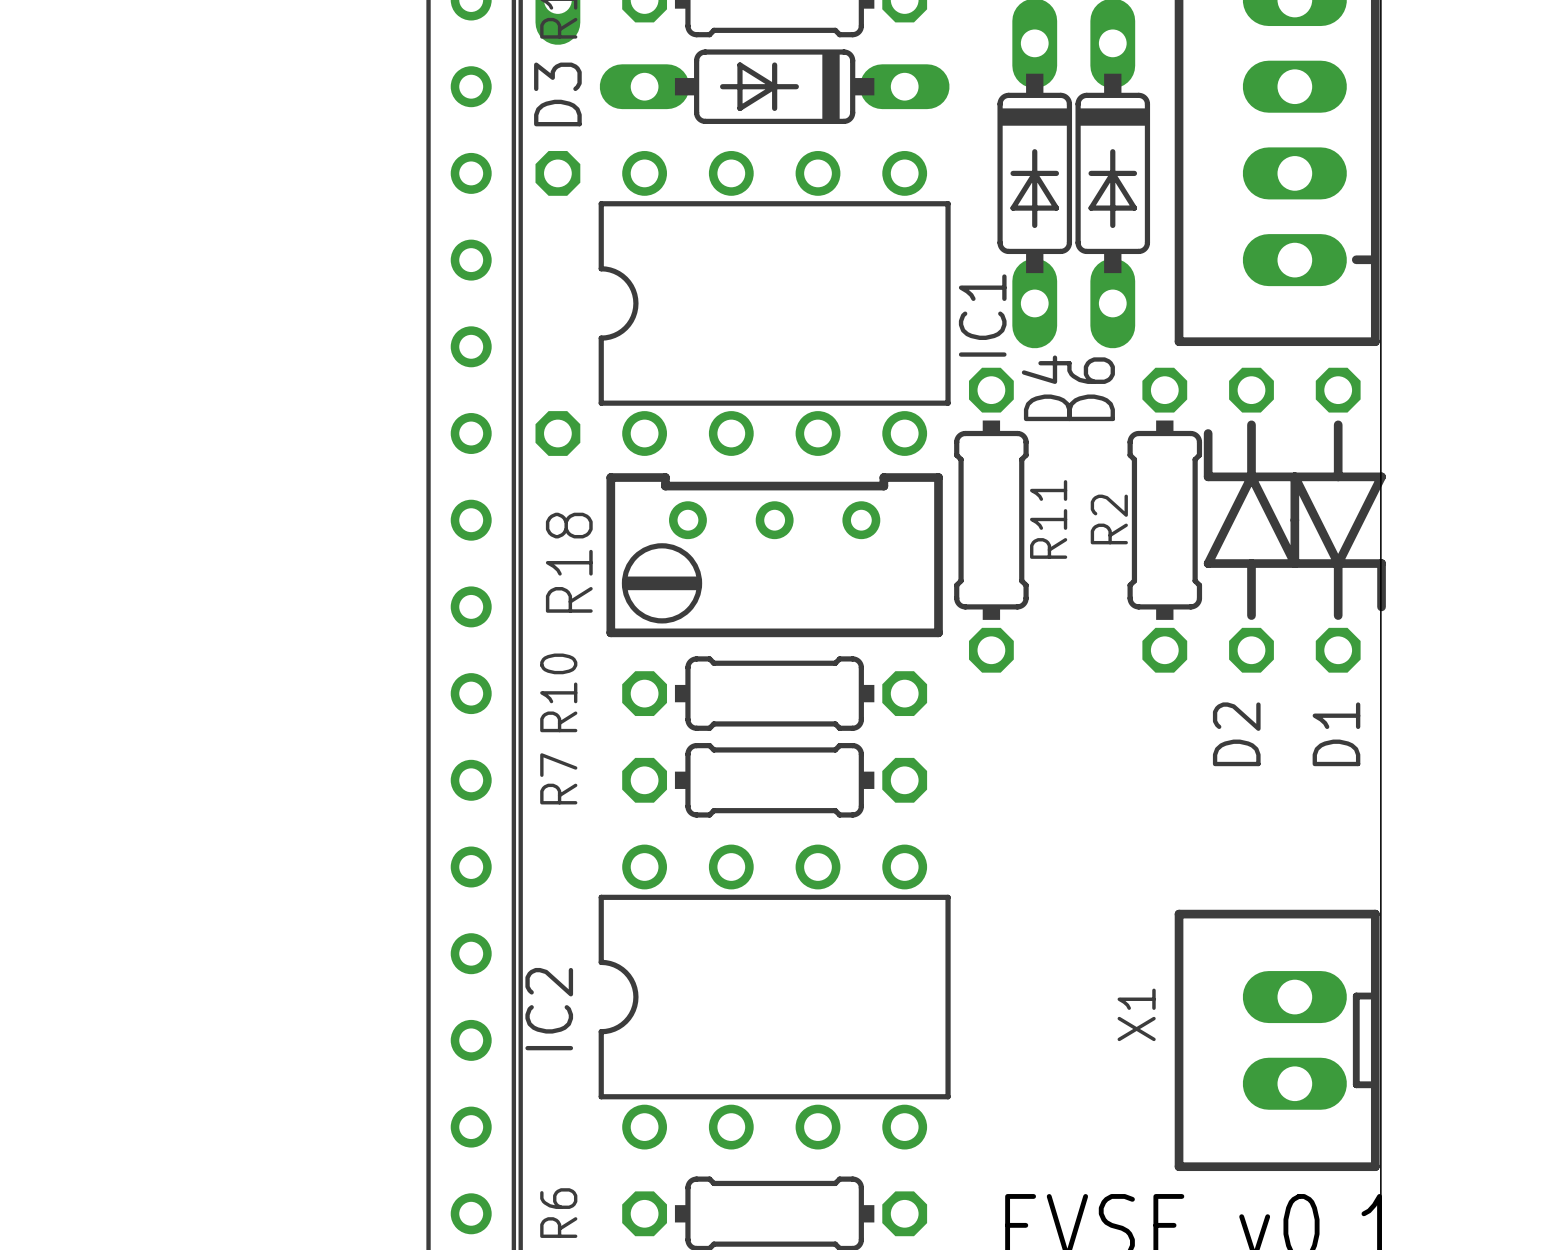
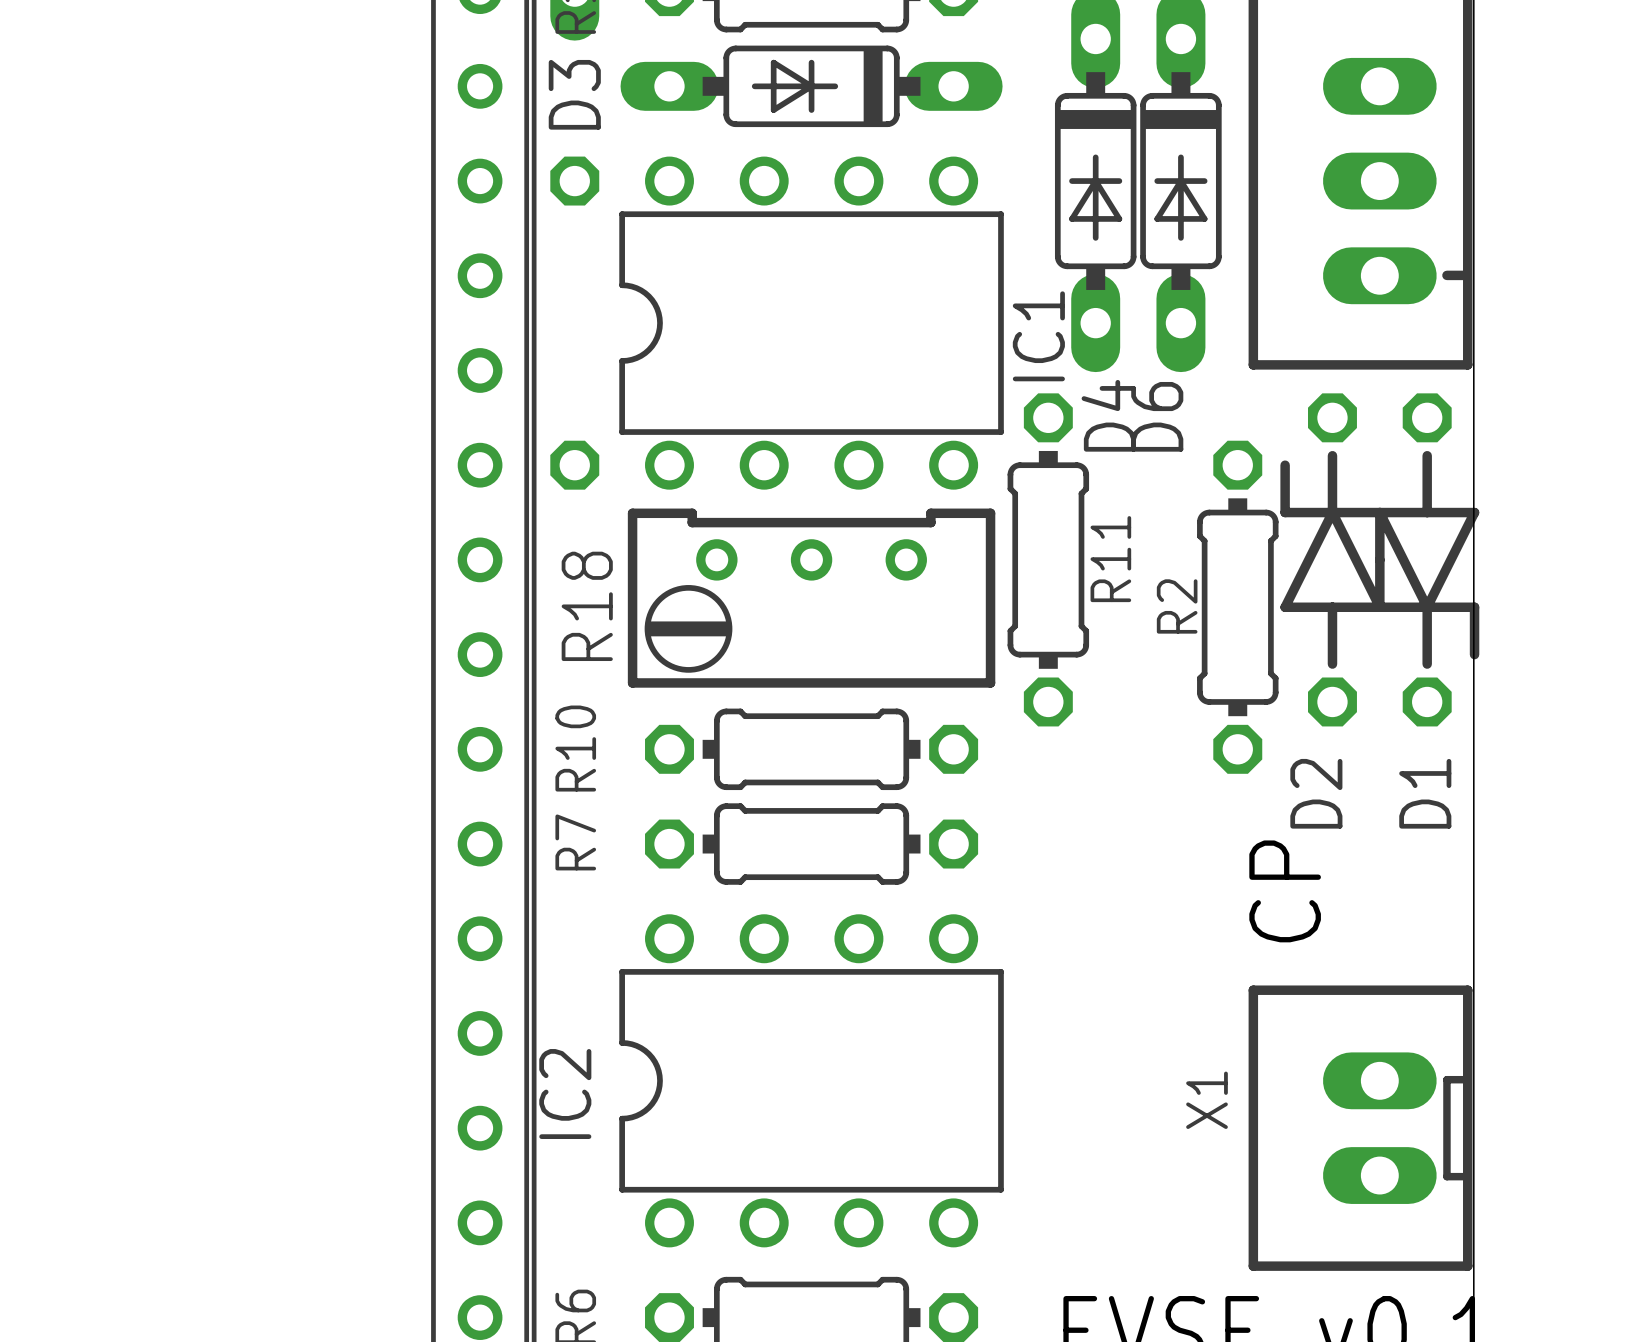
R2 position: (1164, 520) -> (1237, 607)
text: none -> CP (1285, 891)

